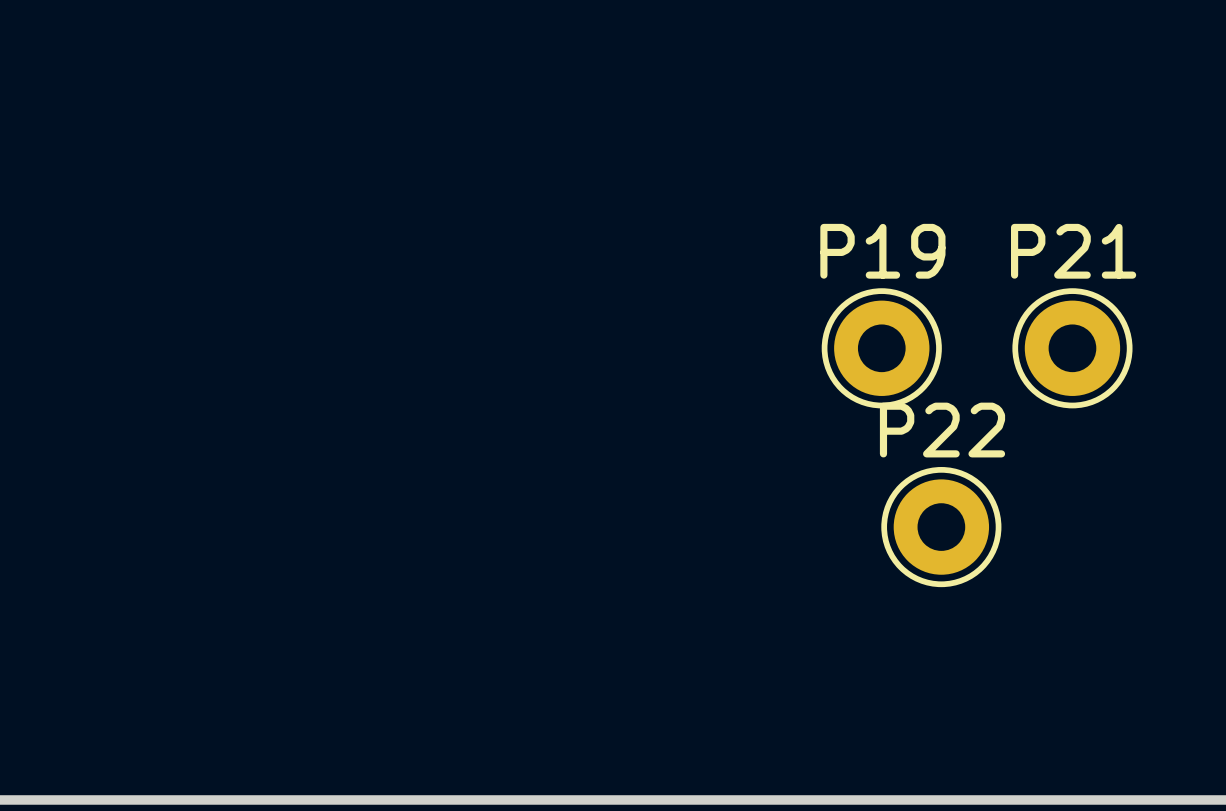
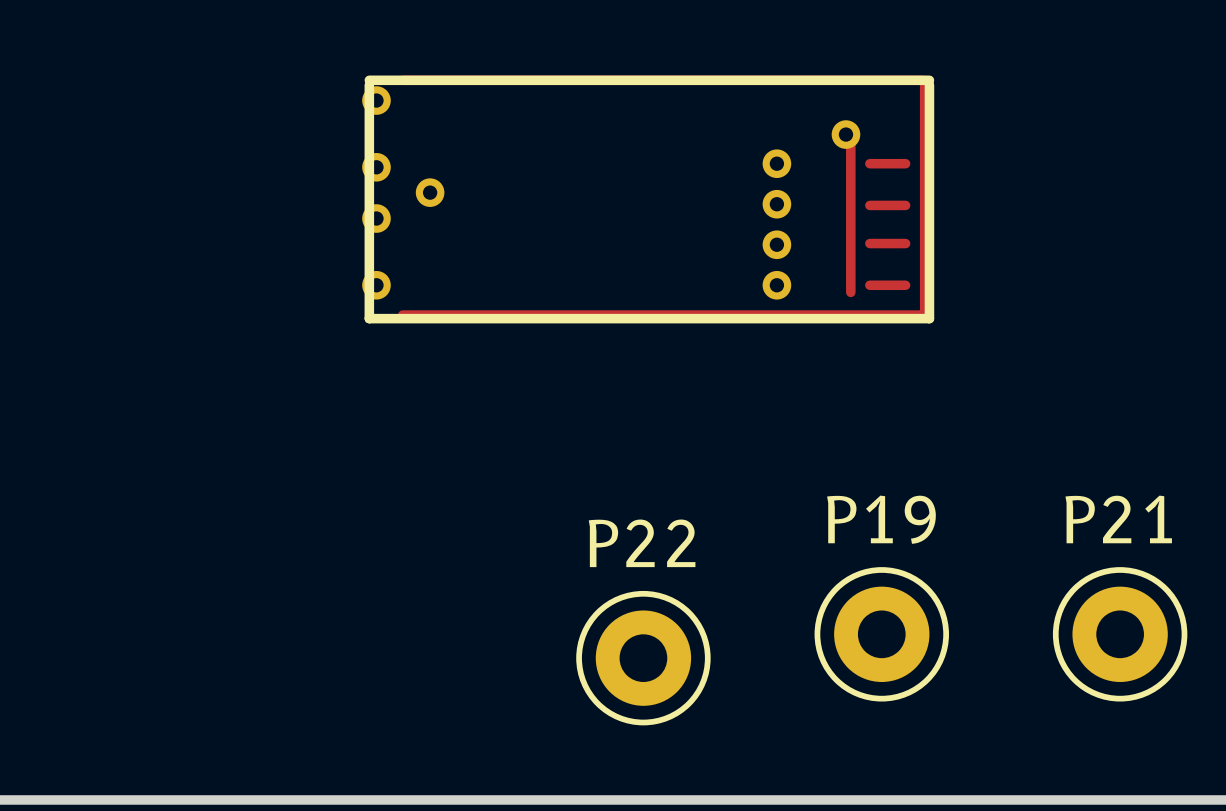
part: none -> (648, 199)
P19 footprint: [821, 288, 942, 409] -> [814, 567, 949, 702]
P21 footprint: [1012, 288, 1133, 409] -> [1052, 567, 1188, 702]
P22 footprint: [881, 467, 1002, 588] -> [576, 590, 711, 726]

